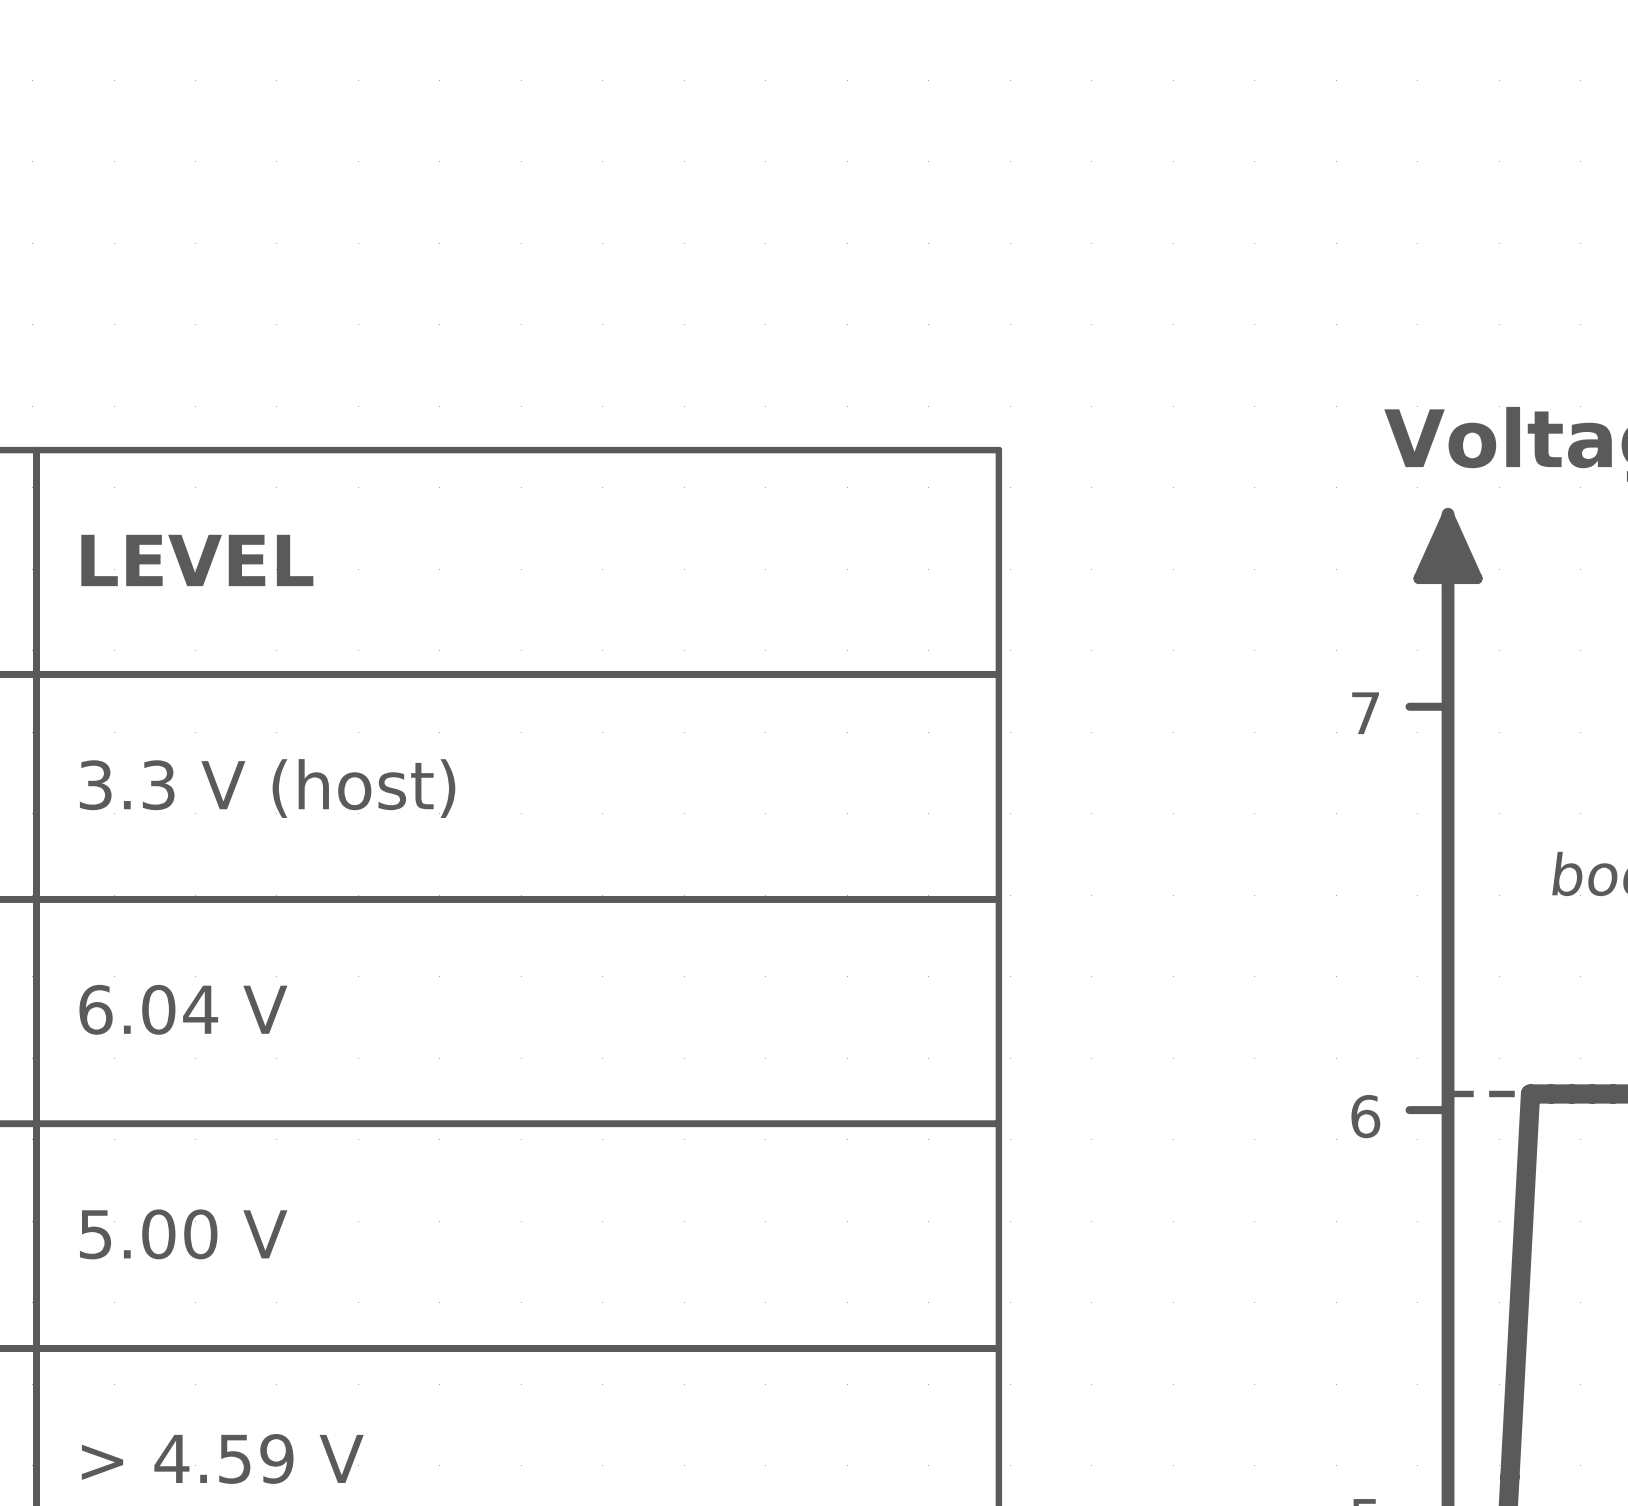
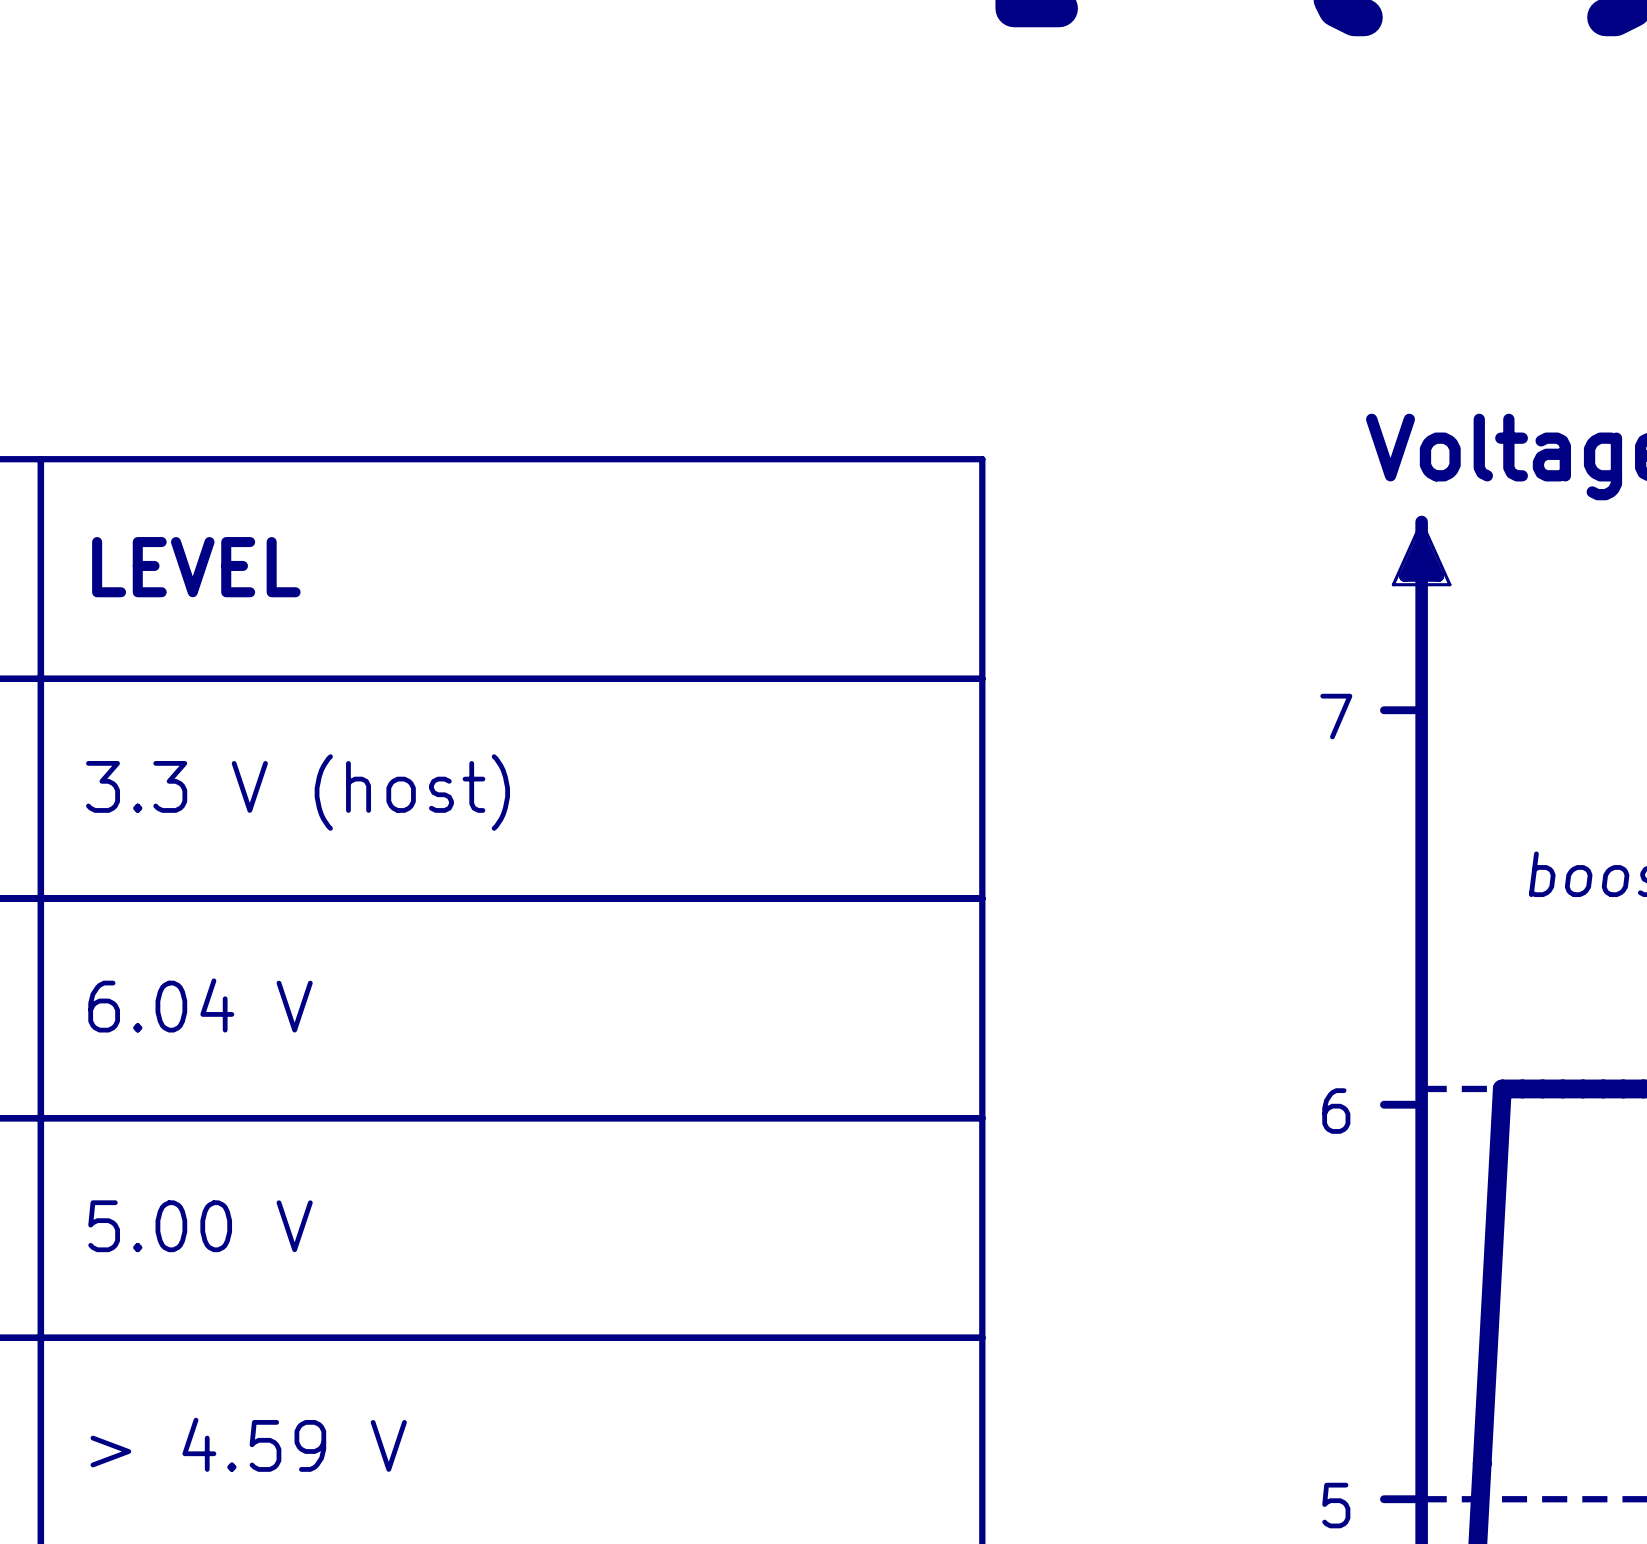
line width: thick (1448, 514) (1476, 578) (1419, 578) (1448, 514) -> thin (1421, 521) (1449, 584) (1393, 584) (1421, 521)

